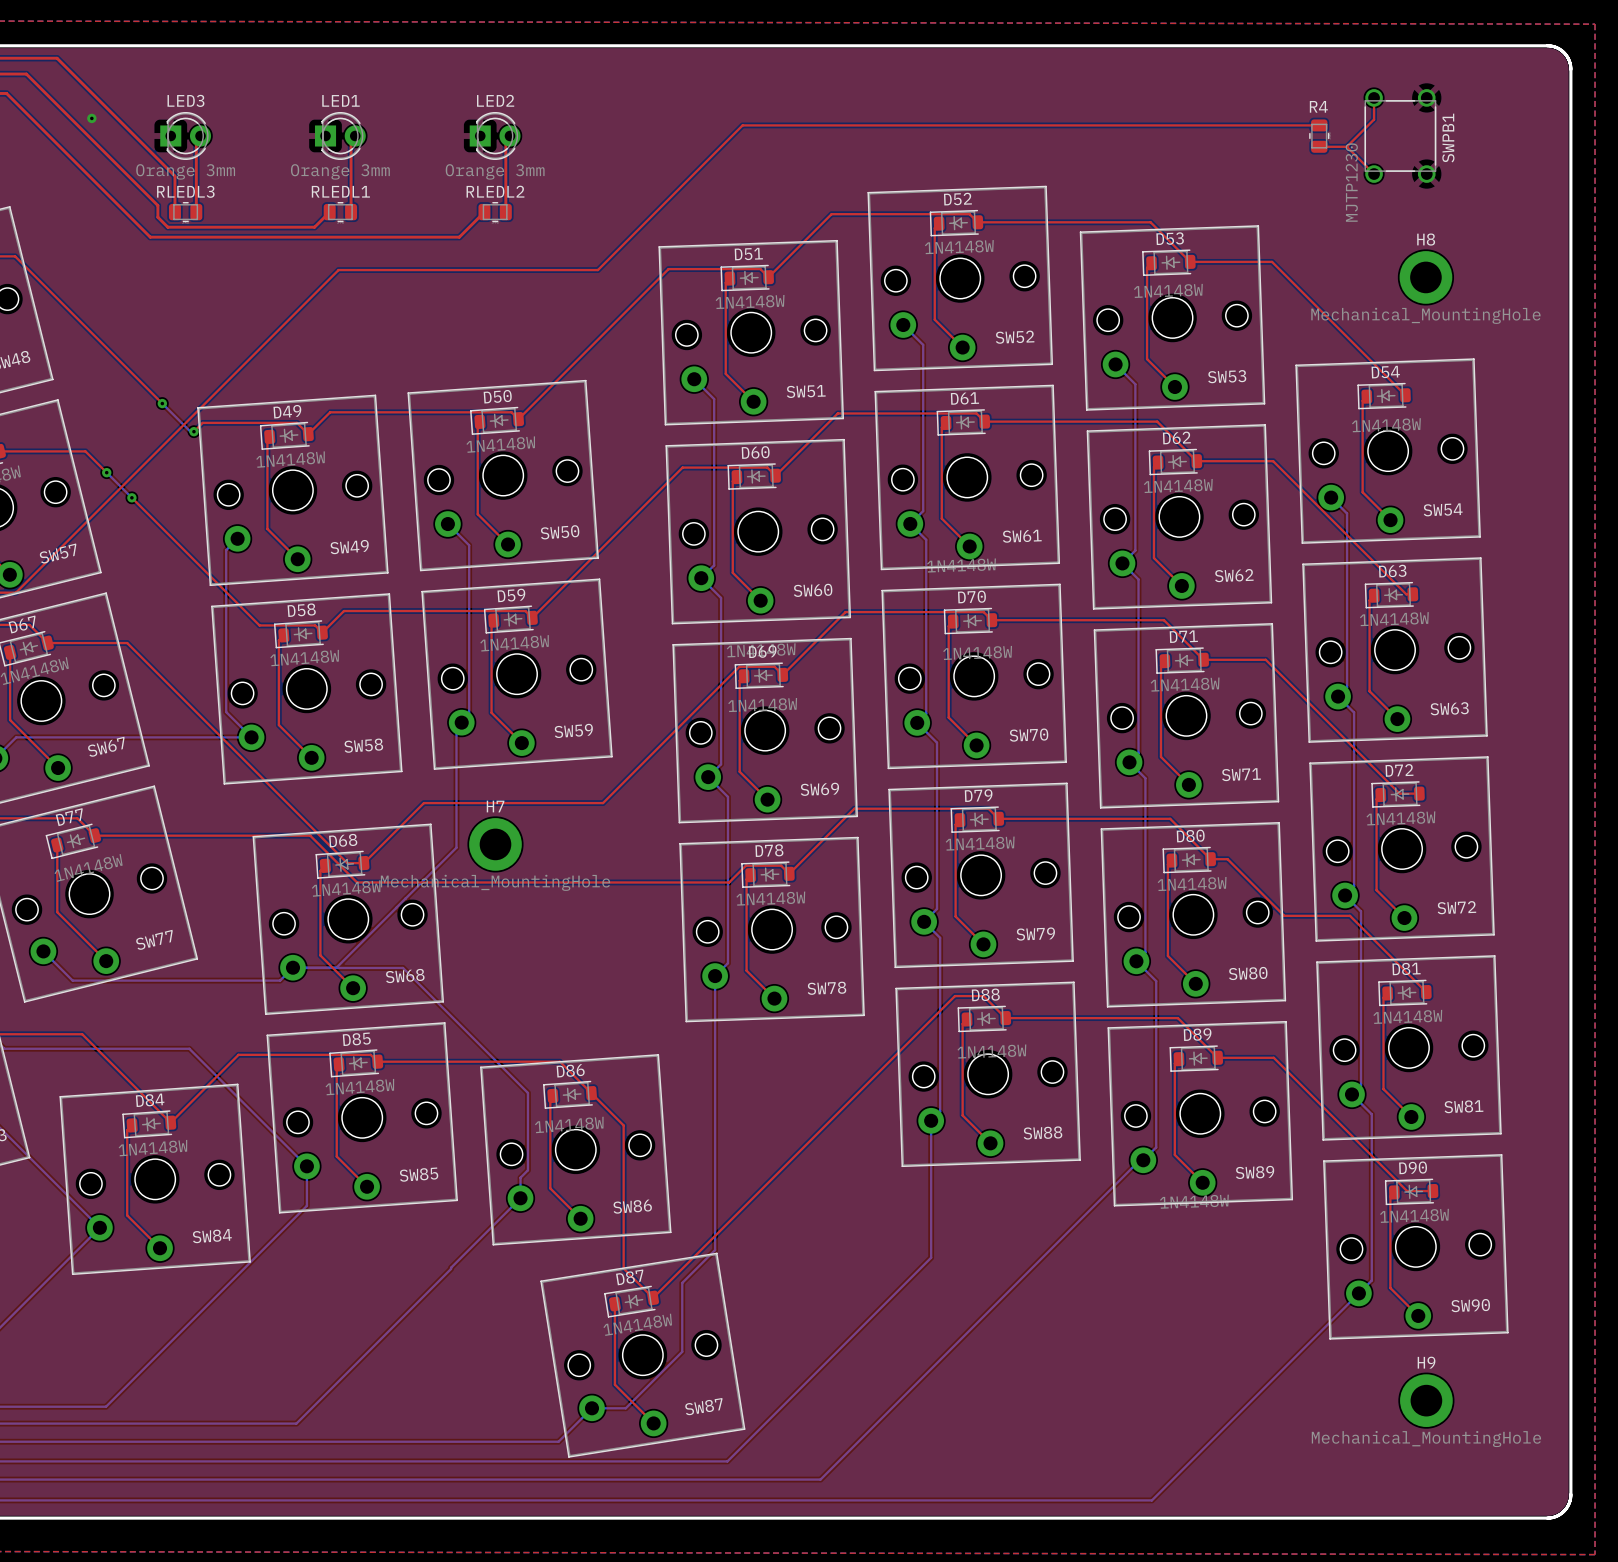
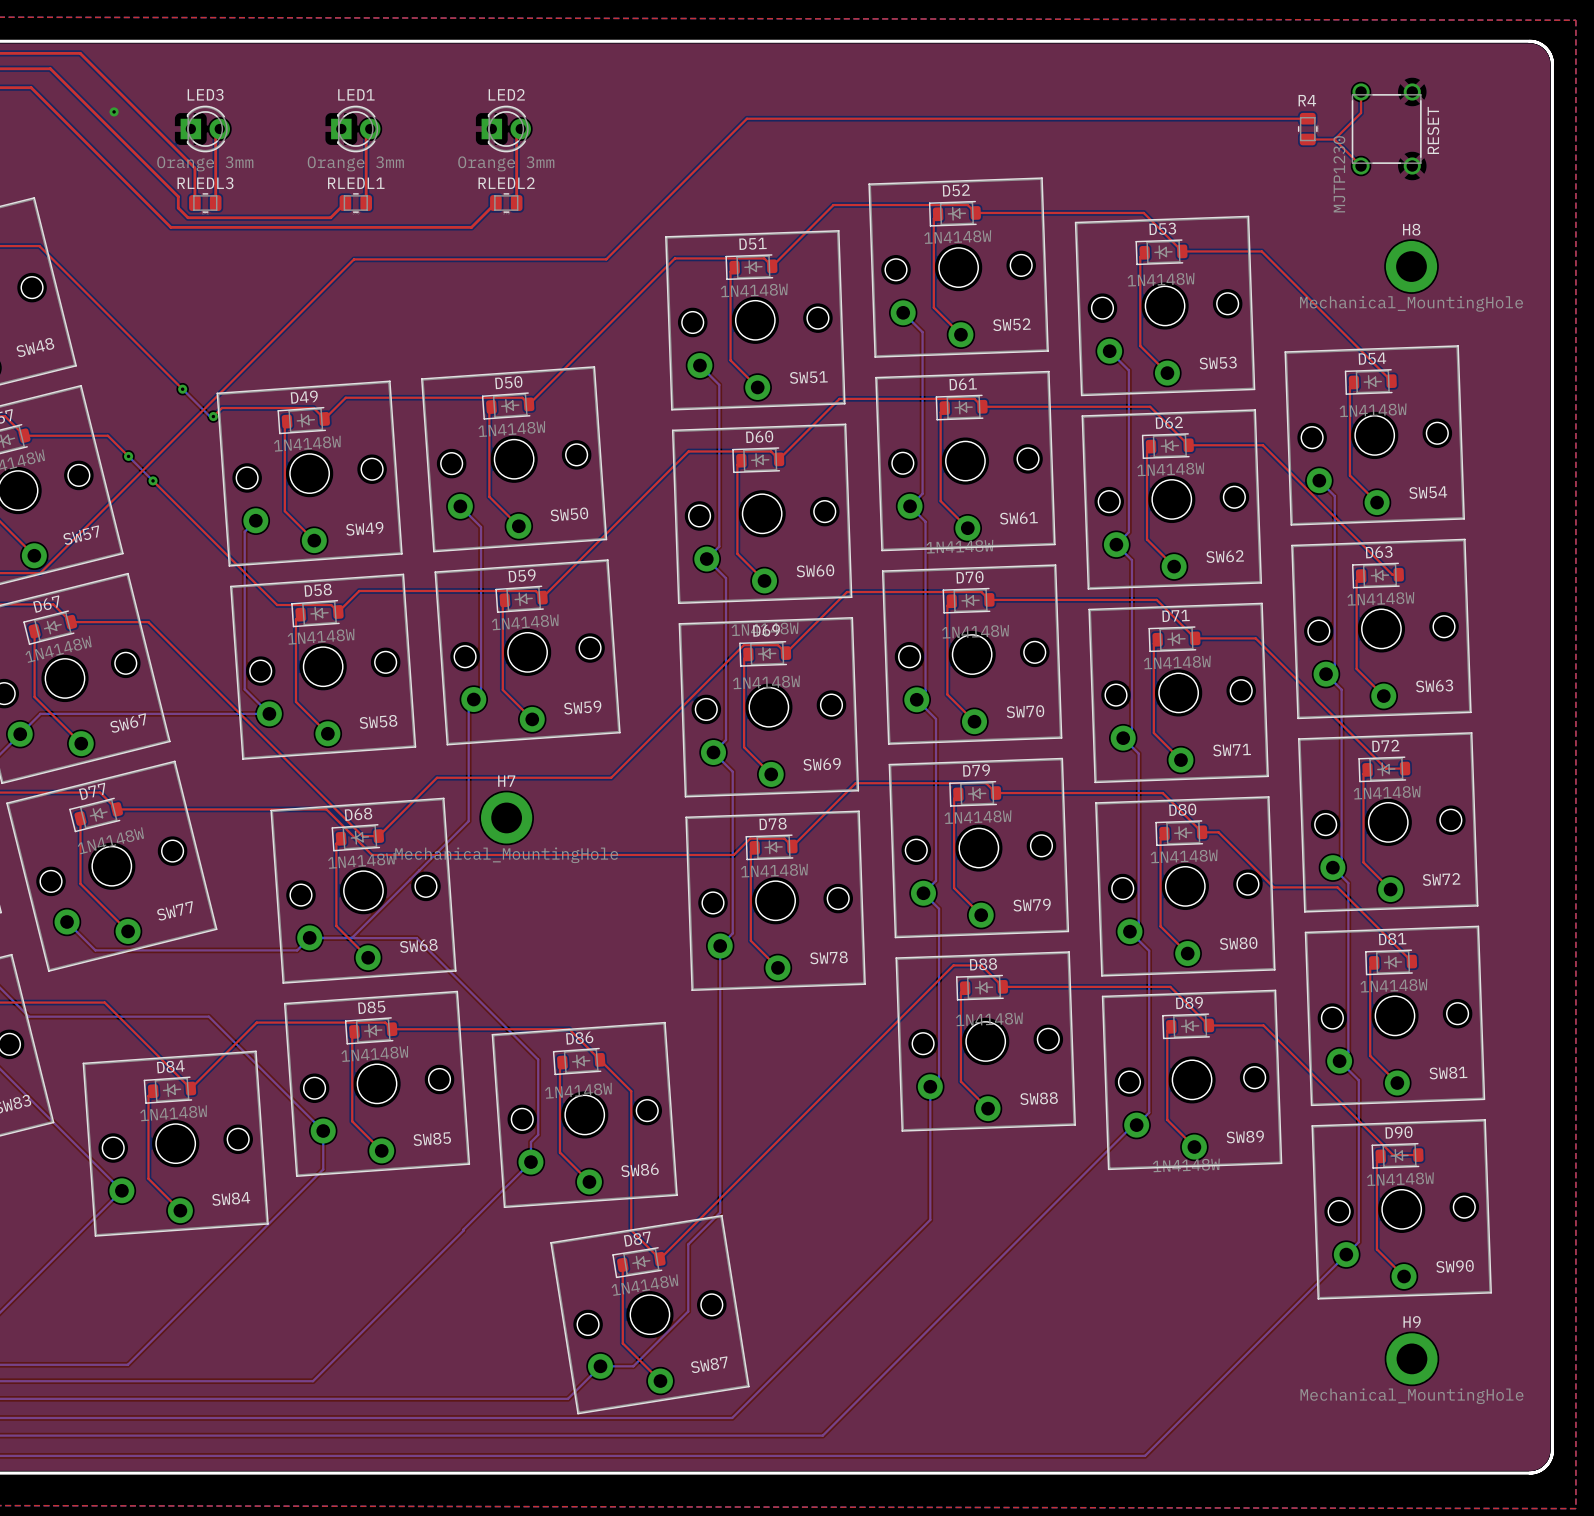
SWPB1 name: SWPB1 (1448, 138) -> RESET (1433, 130)

